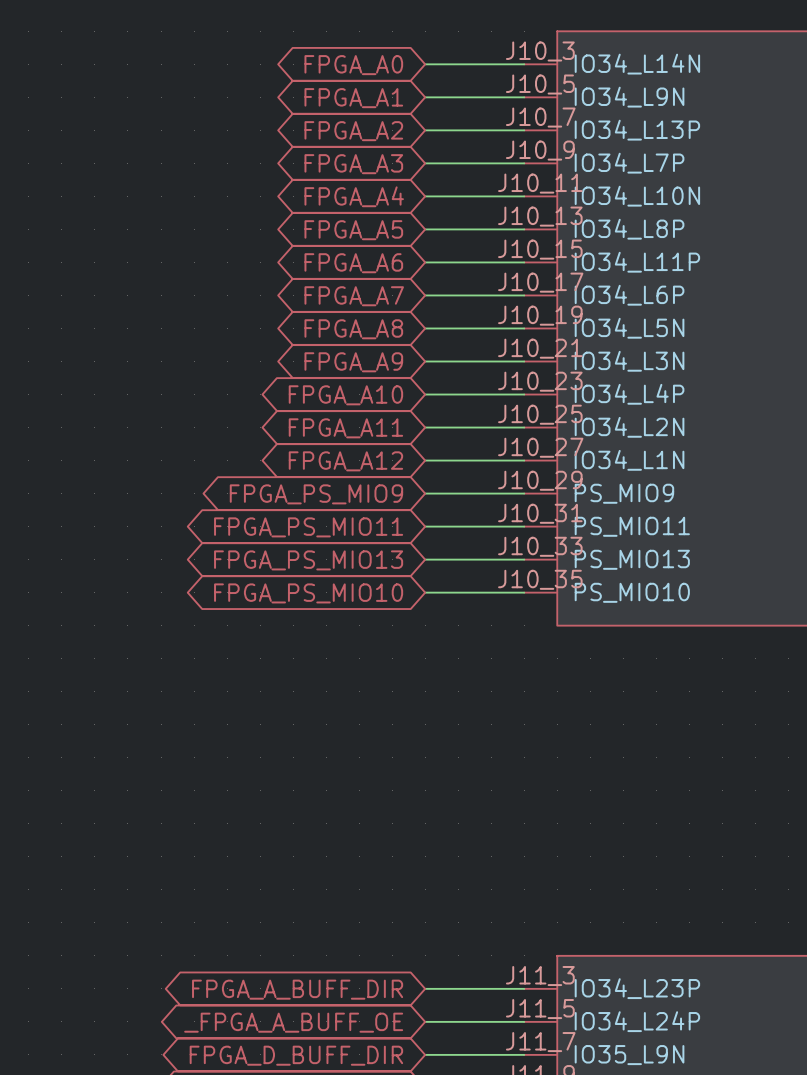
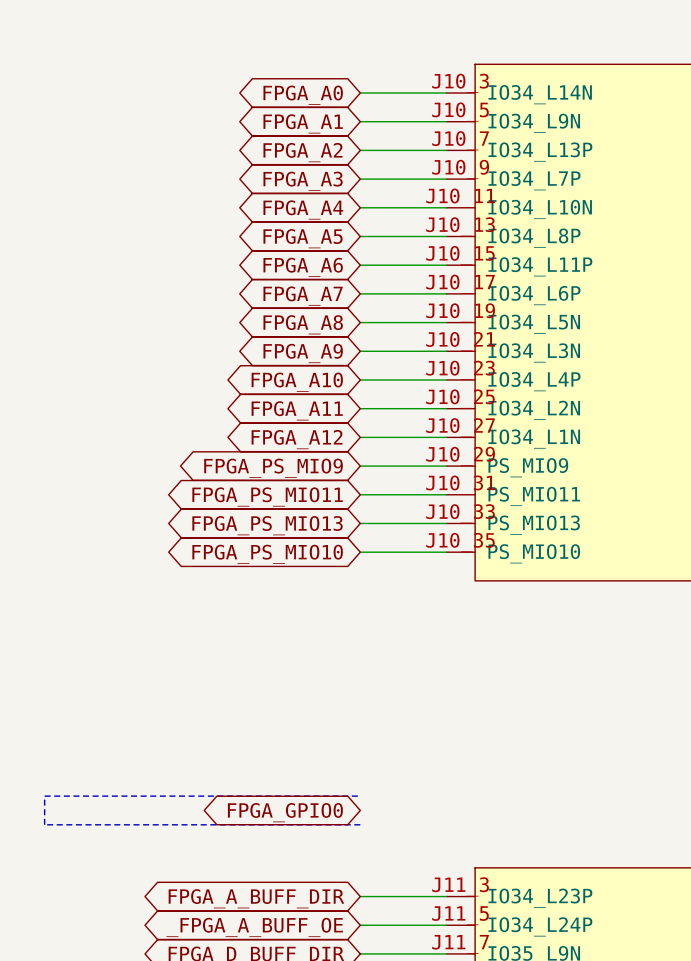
line: none -> (360, 796) (44, 796) (44, 824) (360, 824)
global label: none -> FPGA_GPIO0 (285, 812)

